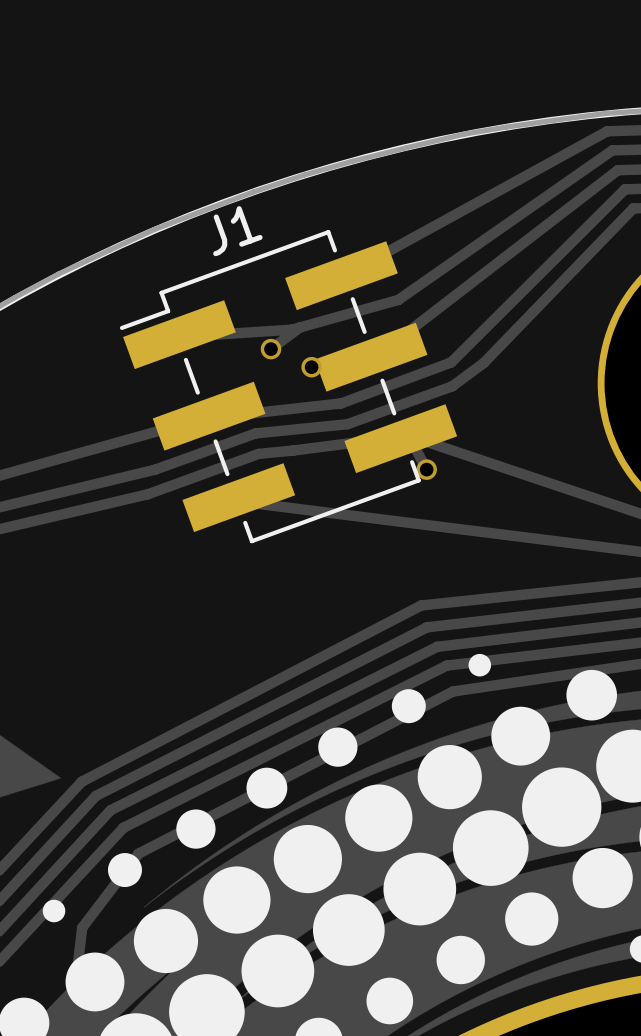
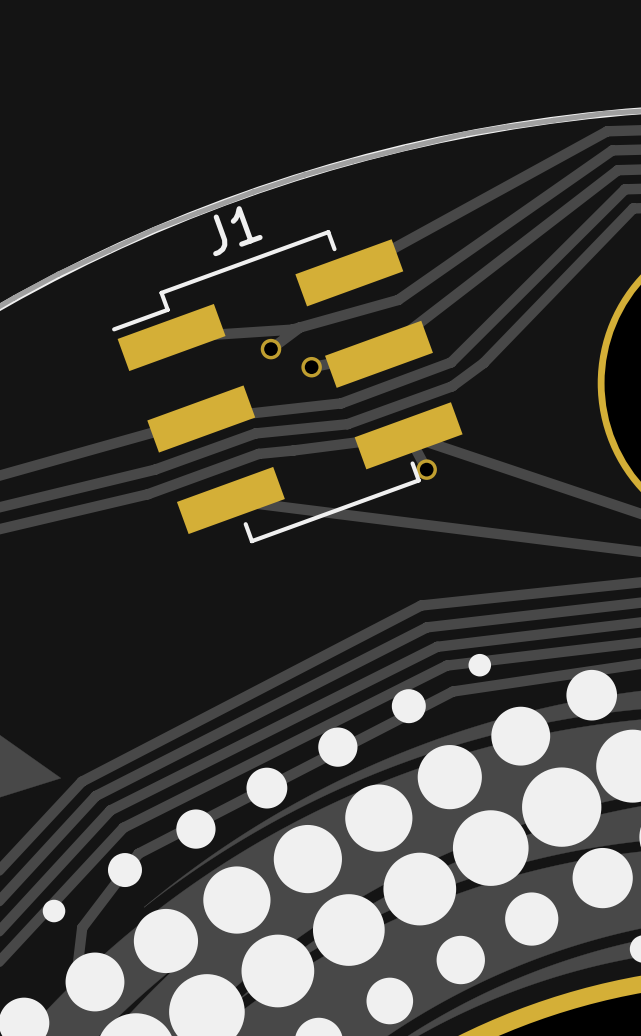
J1 footprint: [119, 230, 458, 544] -> [112, 230, 463, 544]

